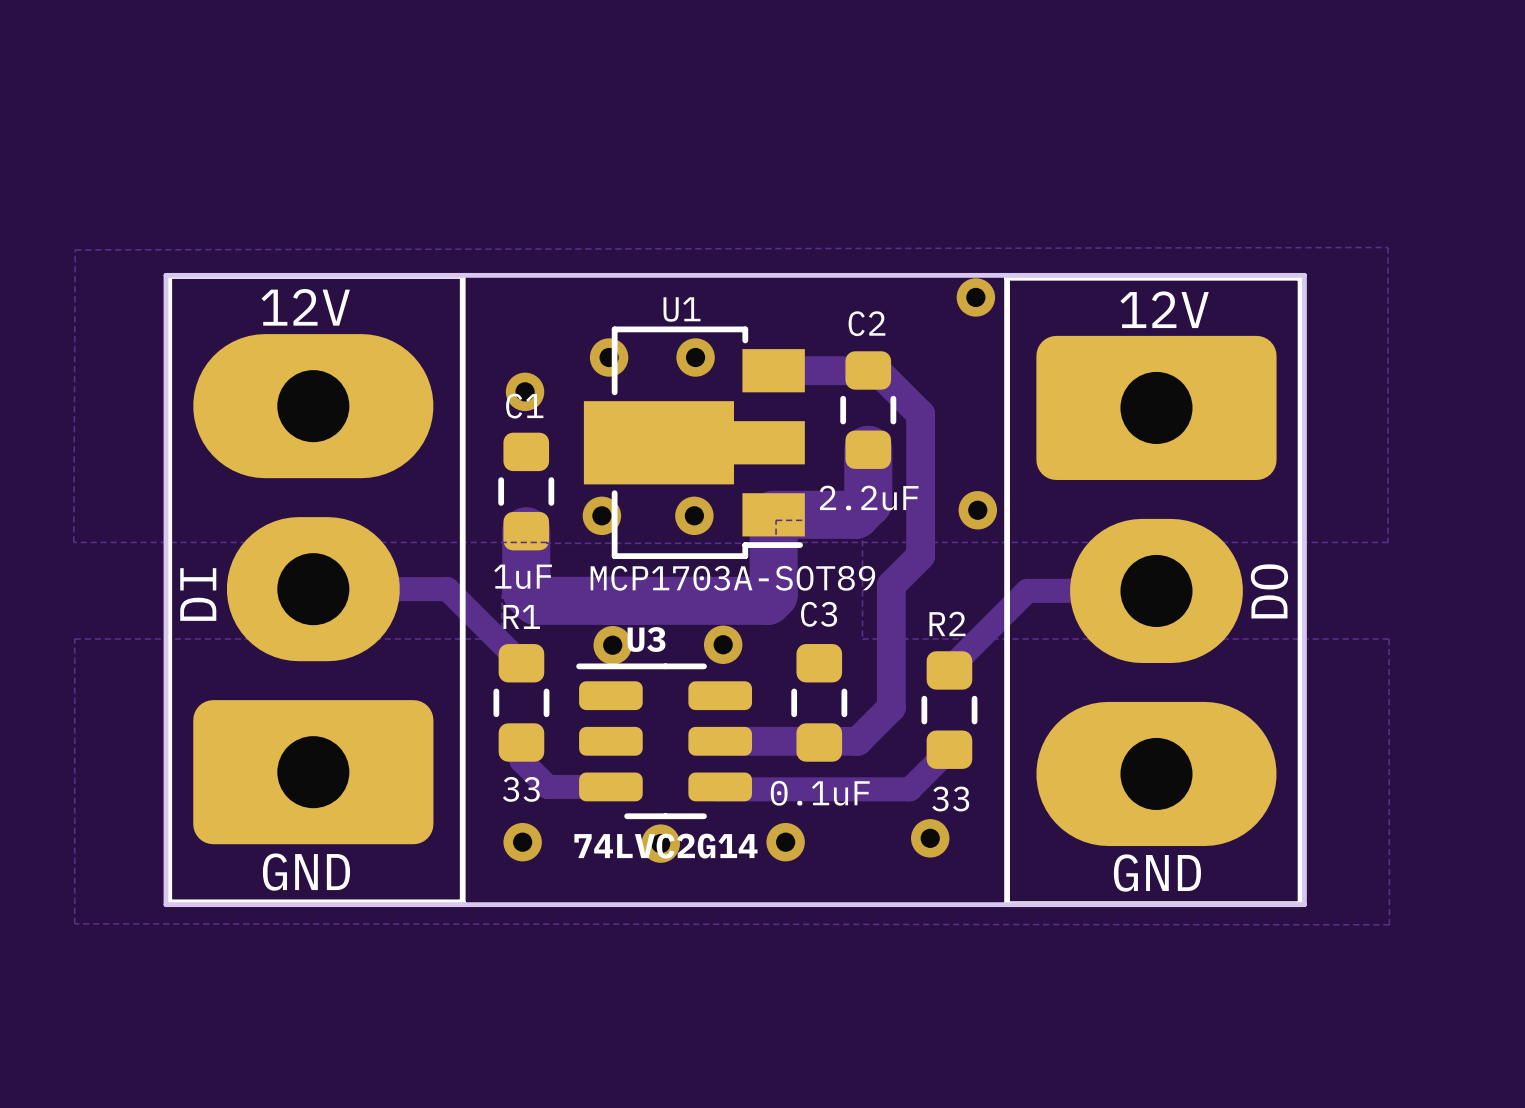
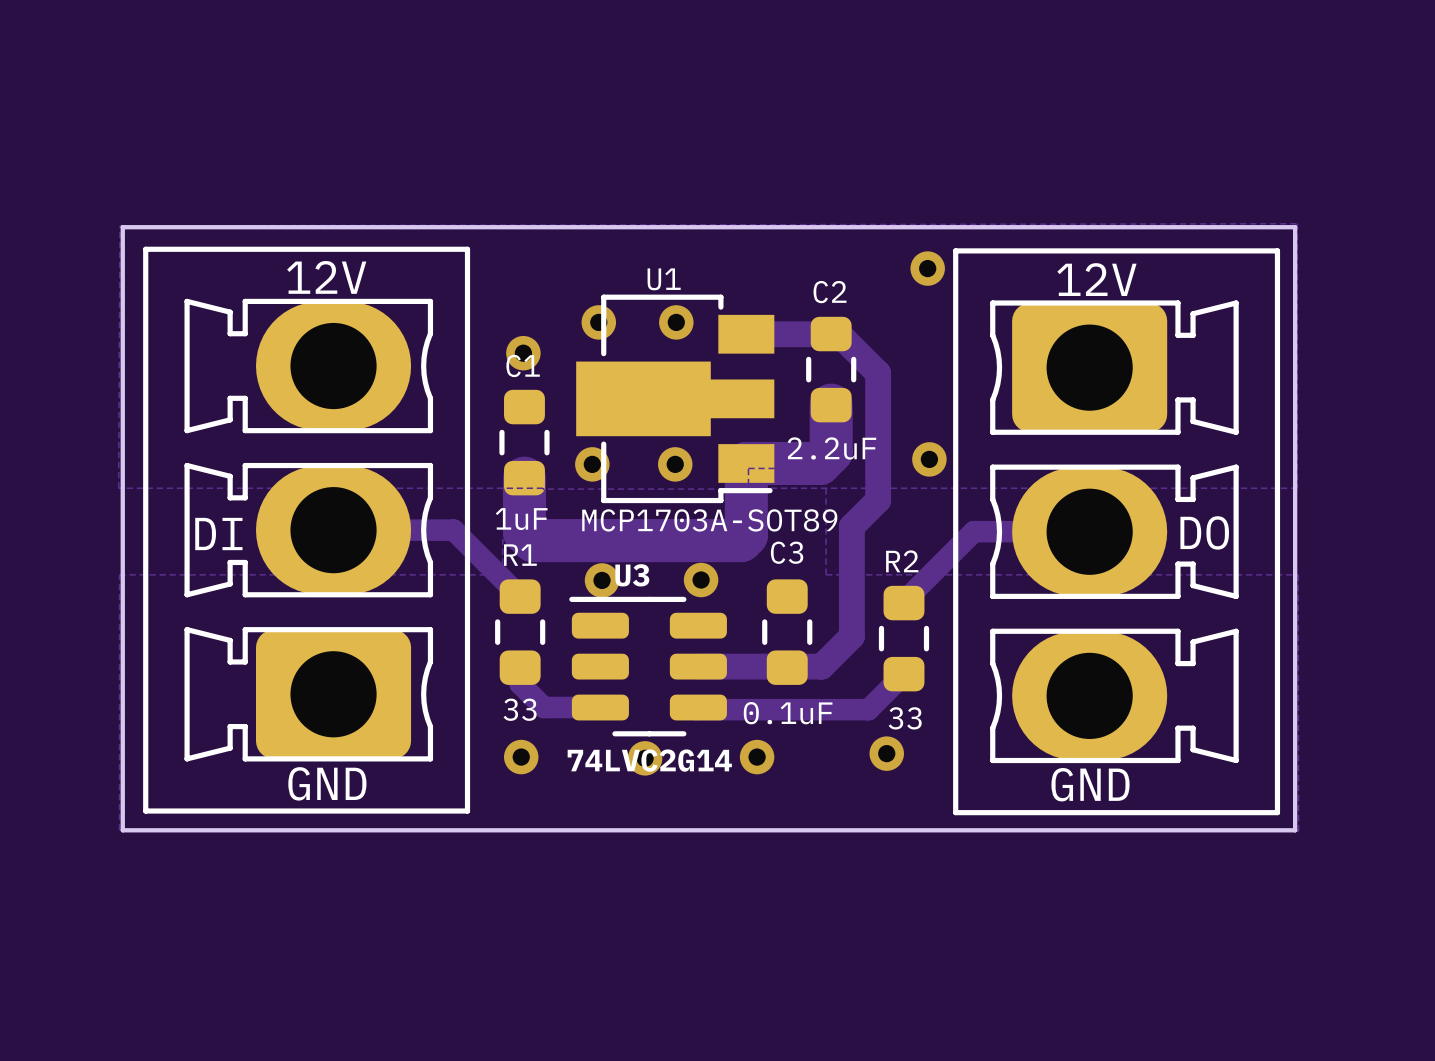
part footprint: [166, 273, 466, 906] -> [143, 246, 471, 814]
part footprint: [1004, 274, 1304, 908] -> [953, 248, 1281, 816]
board edge: (165, 275) (1304, 275) (1304, 904) (165, 904) (165, 275) -> (122, 227) (122, 830) (1295, 830) (1295, 227) (122, 227)
text rotation: 0° (1269, 591) -> 90° clockwise (1204, 532)
text rotation: 0° (198, 594) -> 90° clockwise (218, 534)

